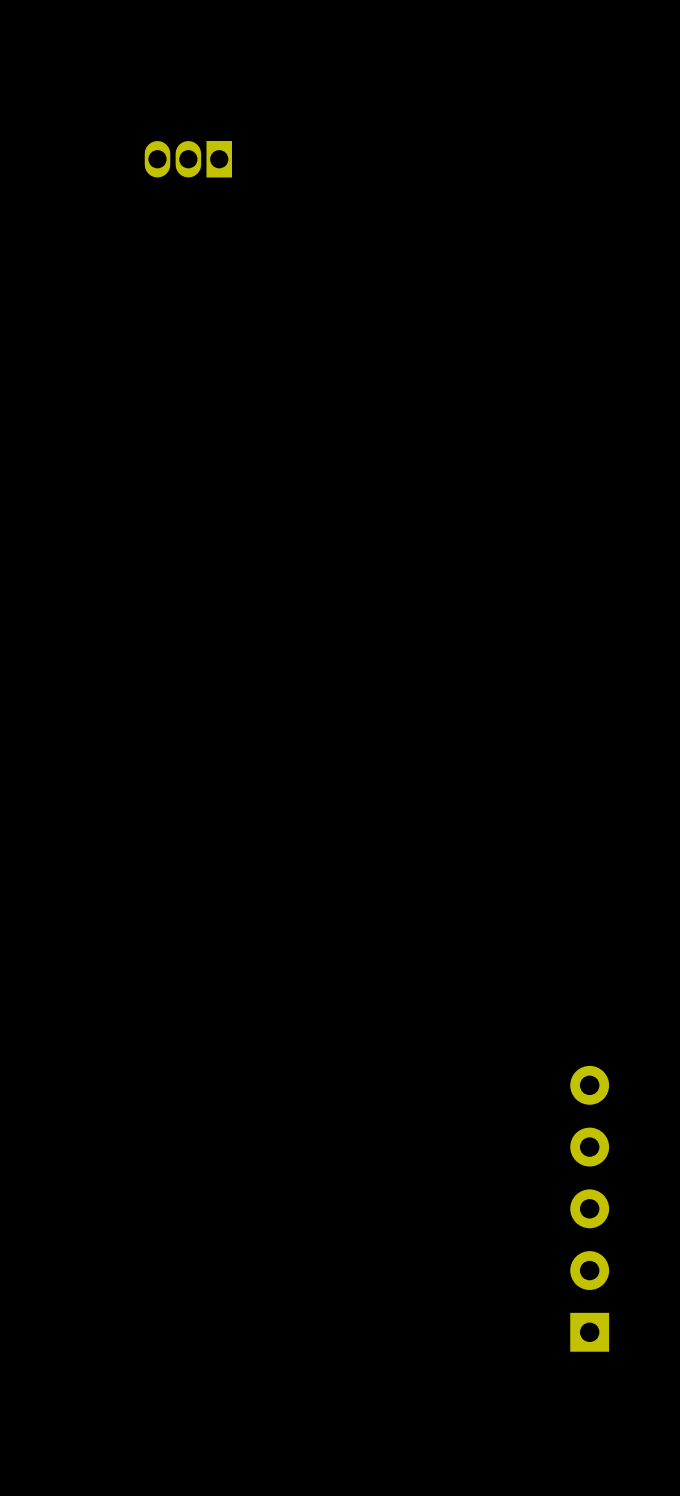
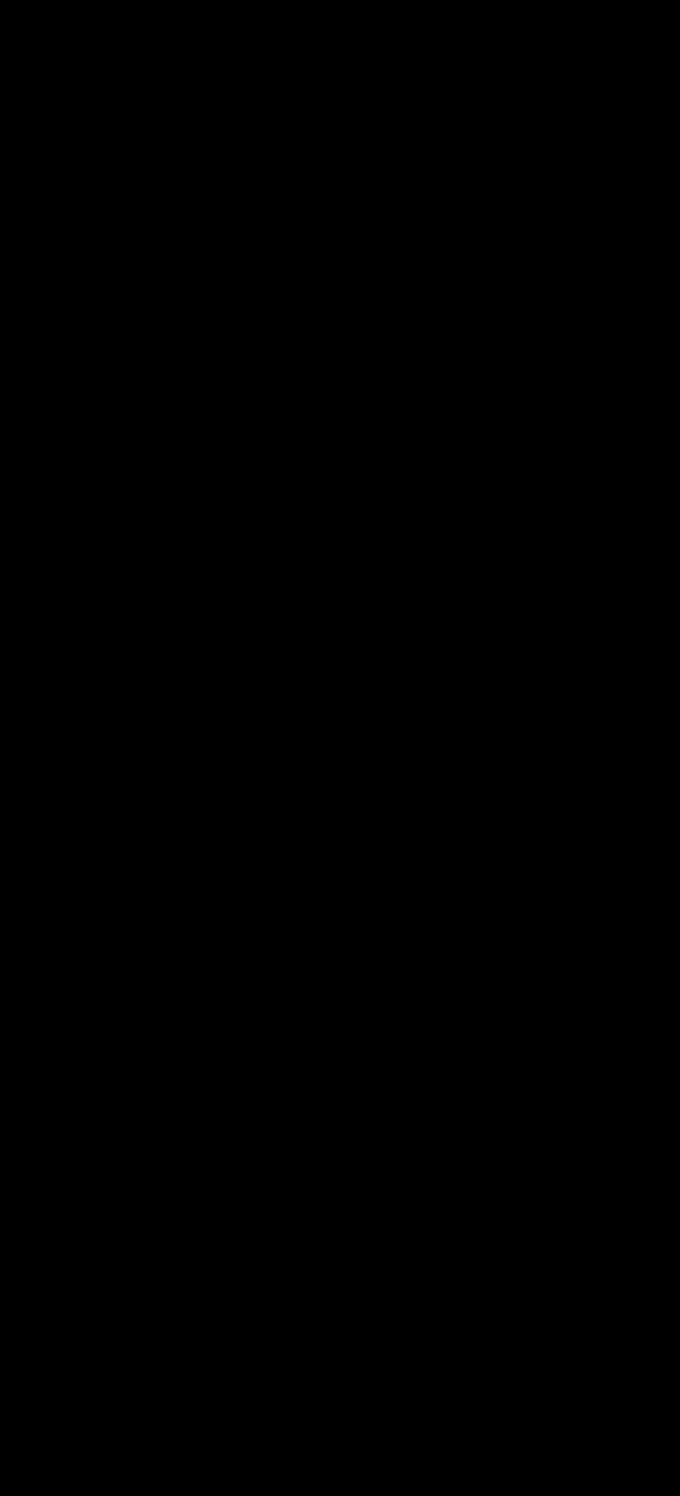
part: (188, 159) -> none
part: (589, 1208) -> none

